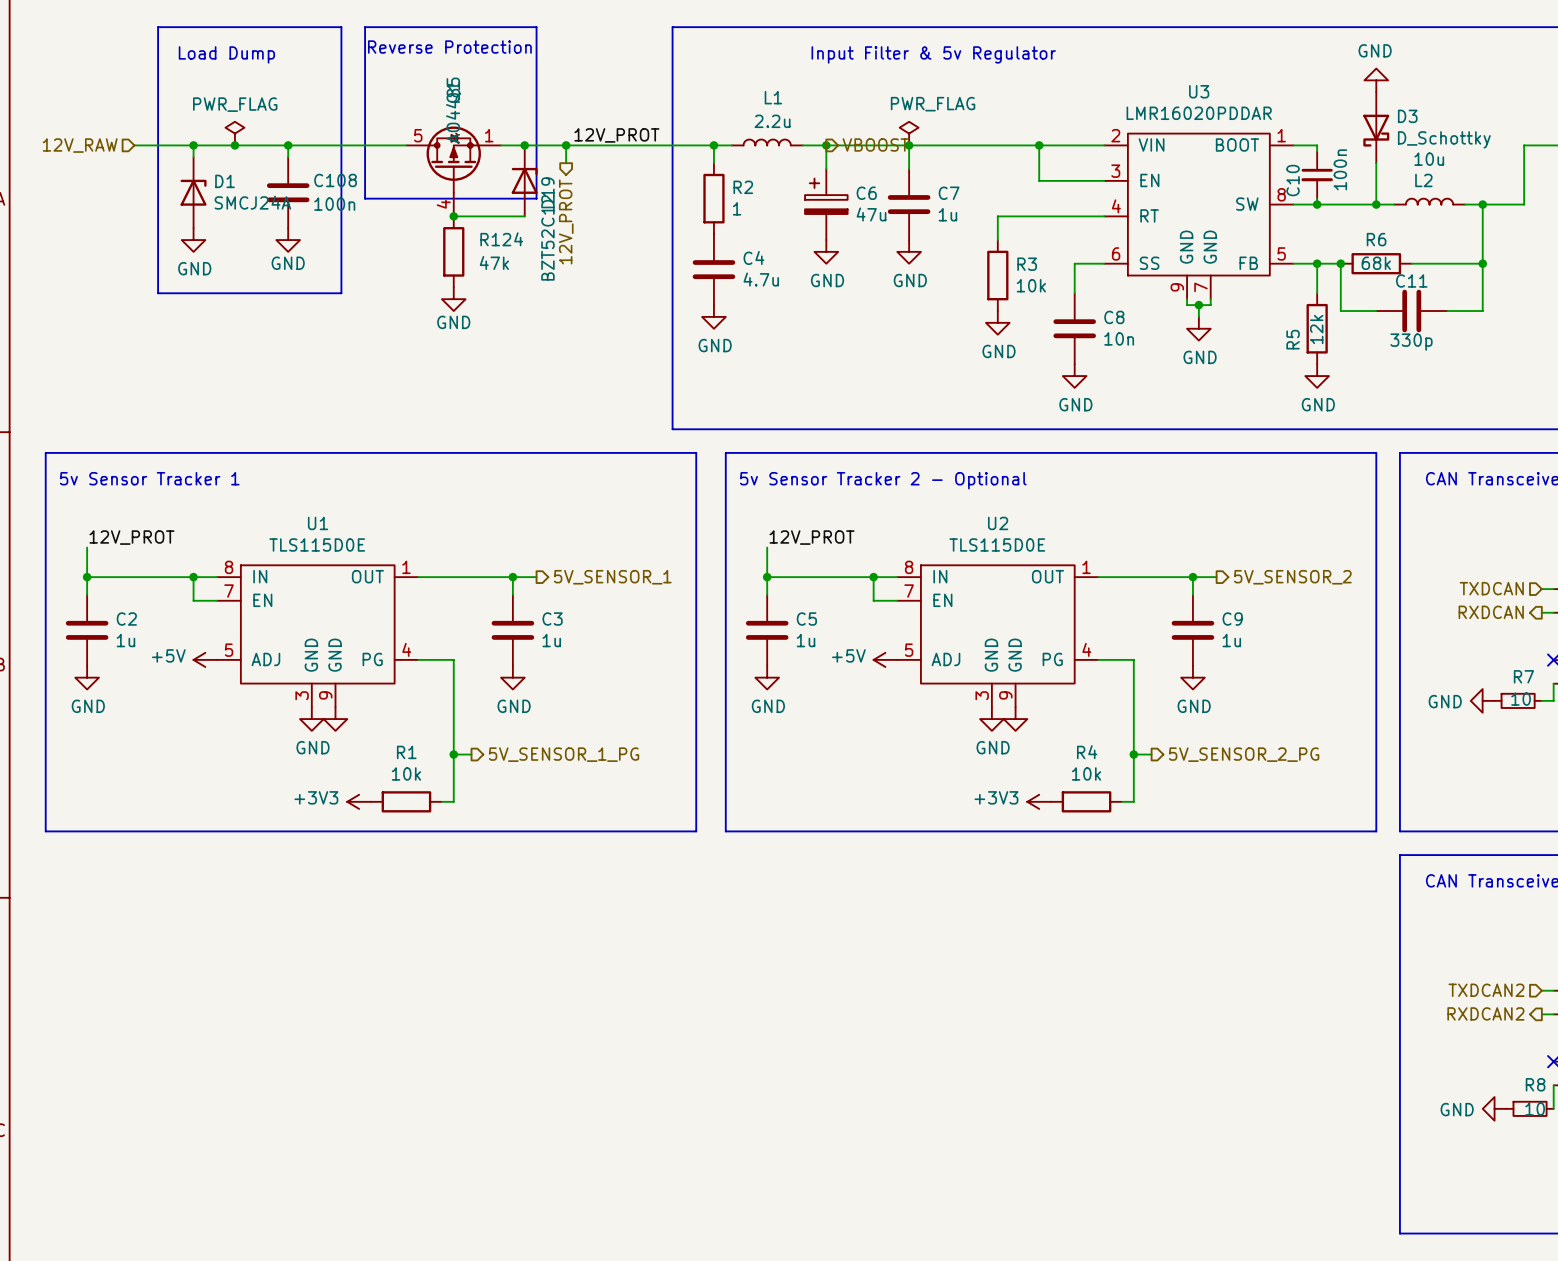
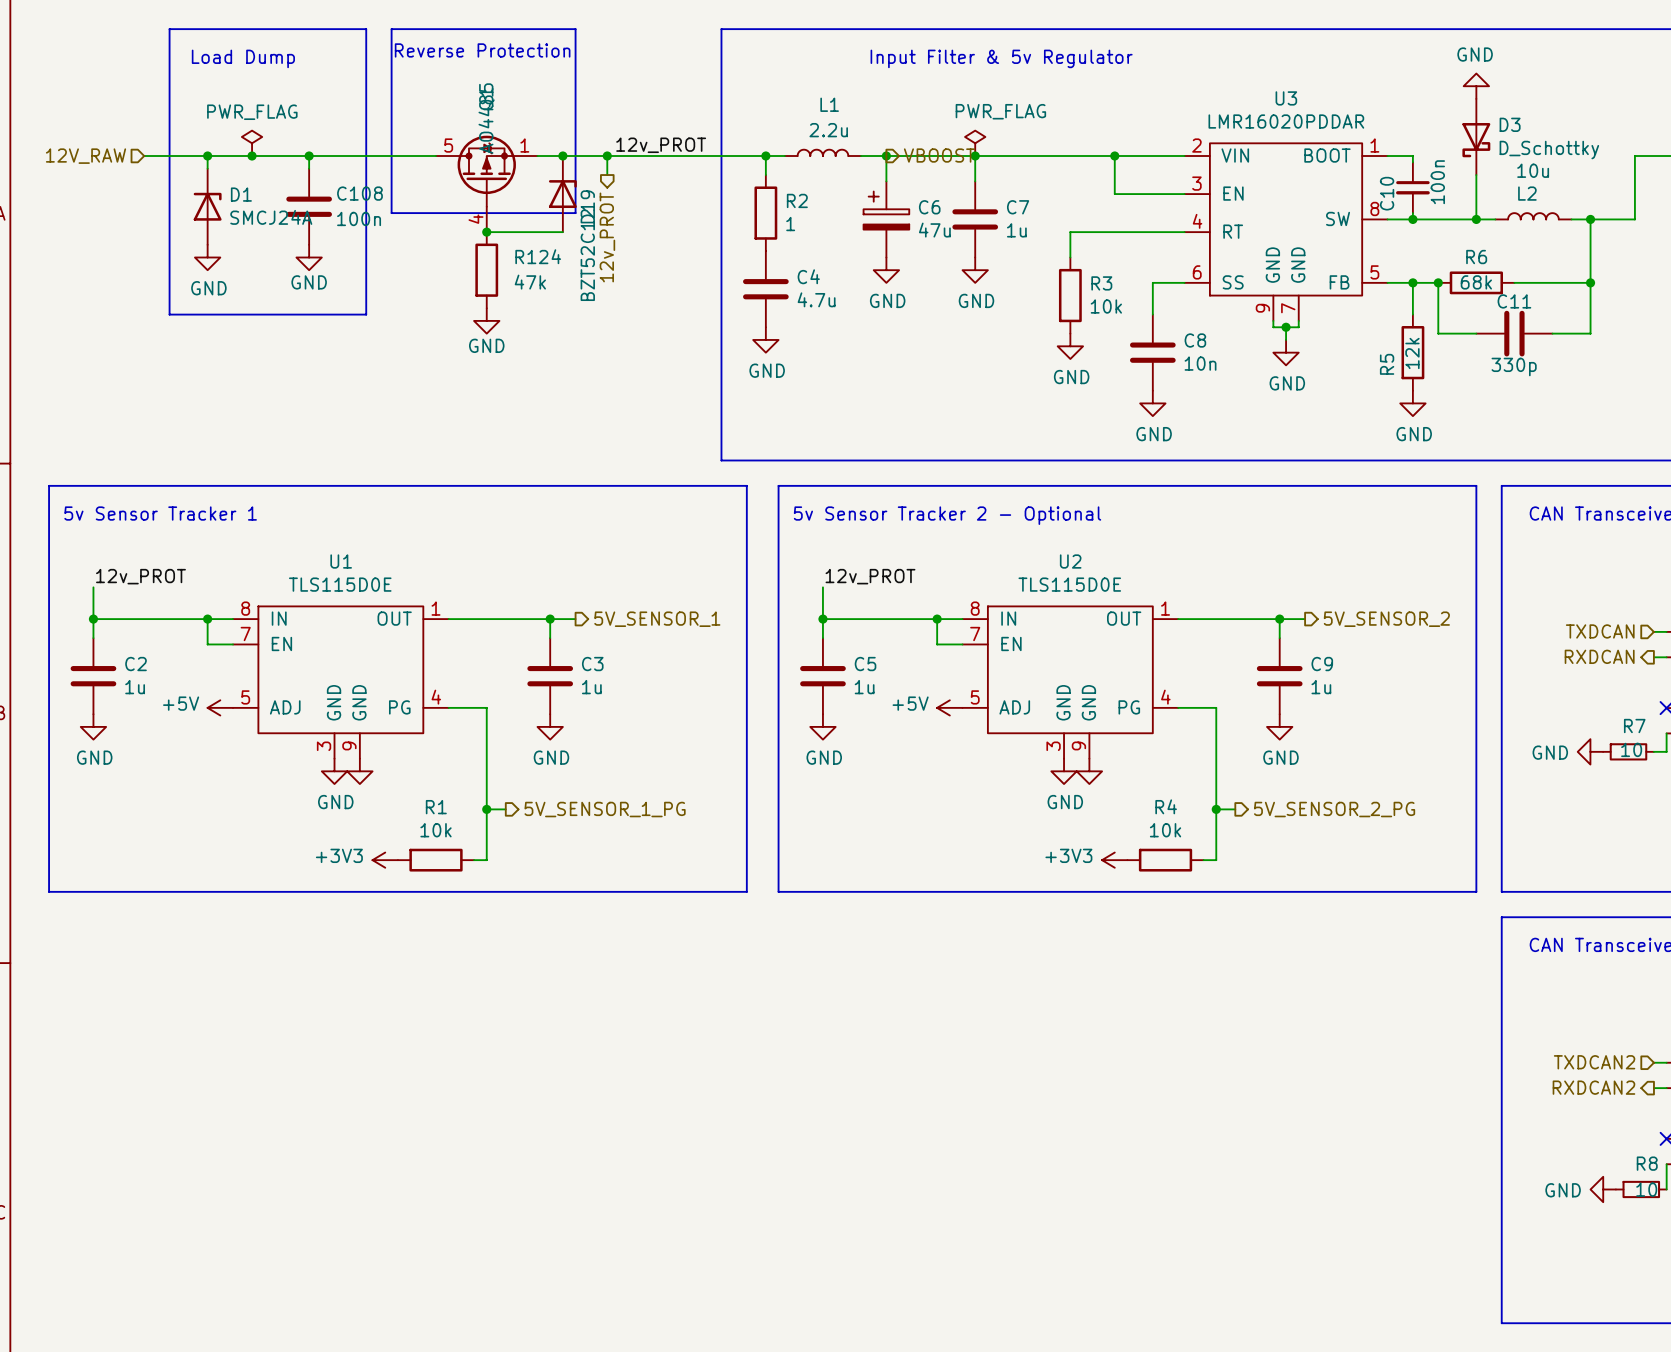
label: 12V_PROT (616, 135) -> 12v_PROT (661, 145)
hierarchical label: 12V_PROT (566, 221) -> 12v_PROT (607, 237)
label: 12V_PROT (131, 537) -> 12v_PROT (140, 576)
label: 12V_PROT (812, 537) -> 12v_PROT (870, 576)

